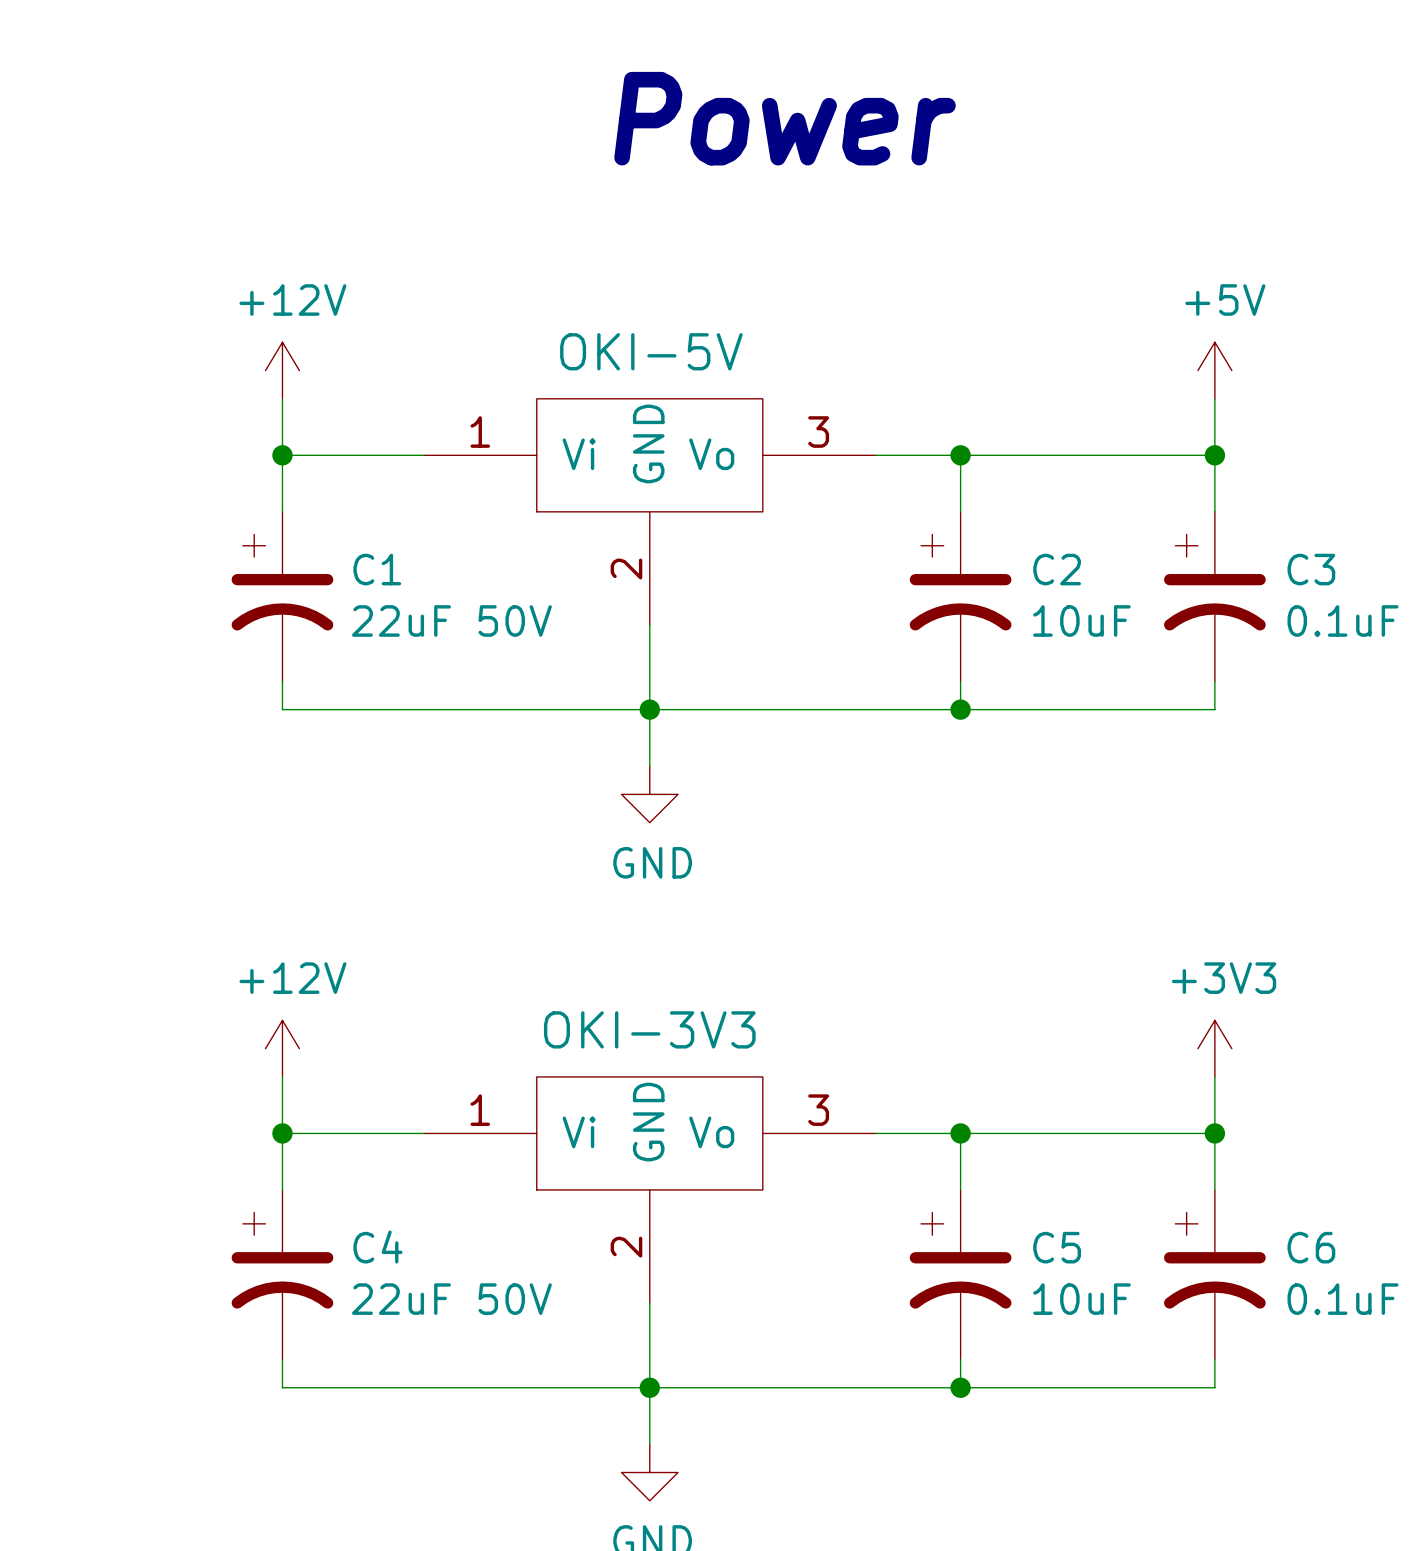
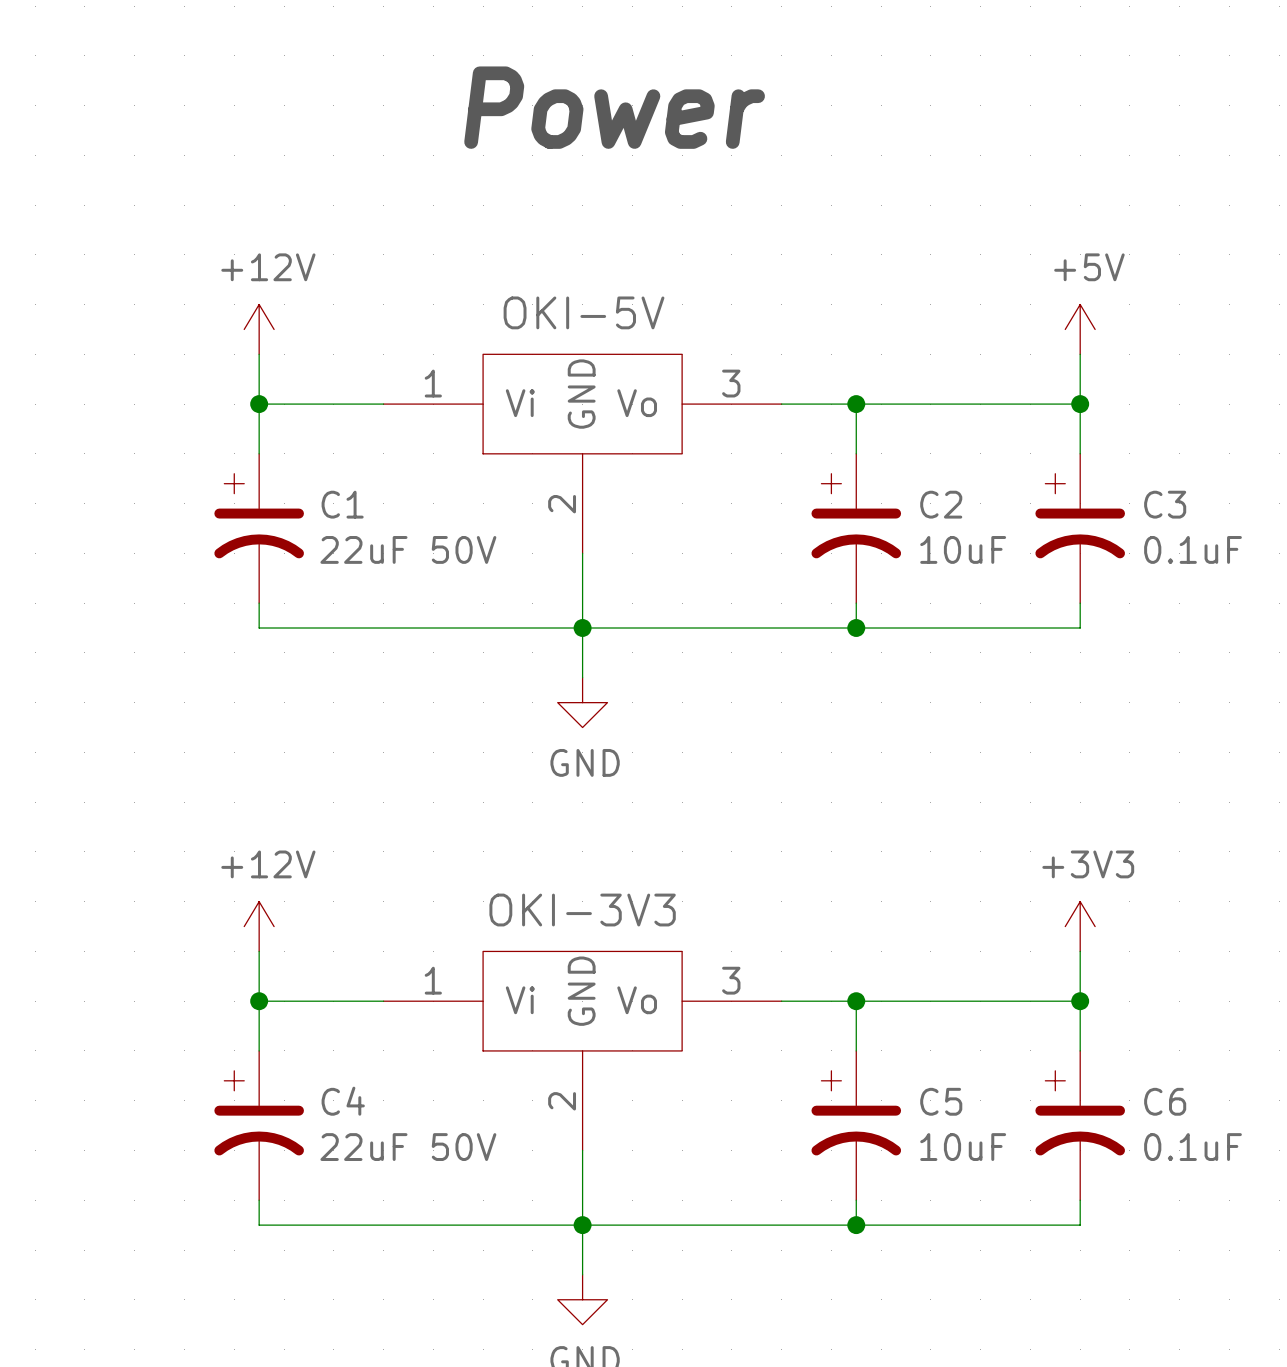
text position: Power (785, 118) -> Power (614, 107)

